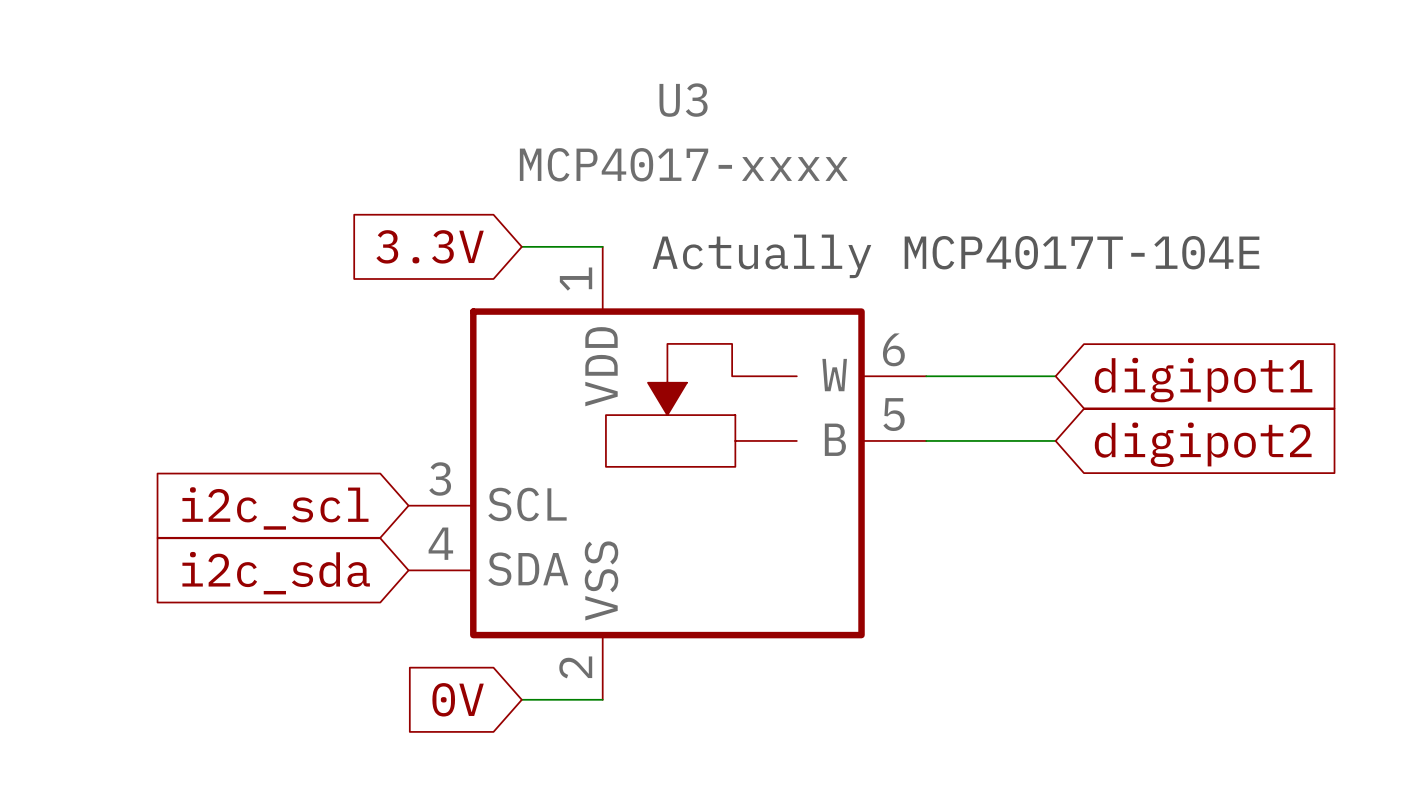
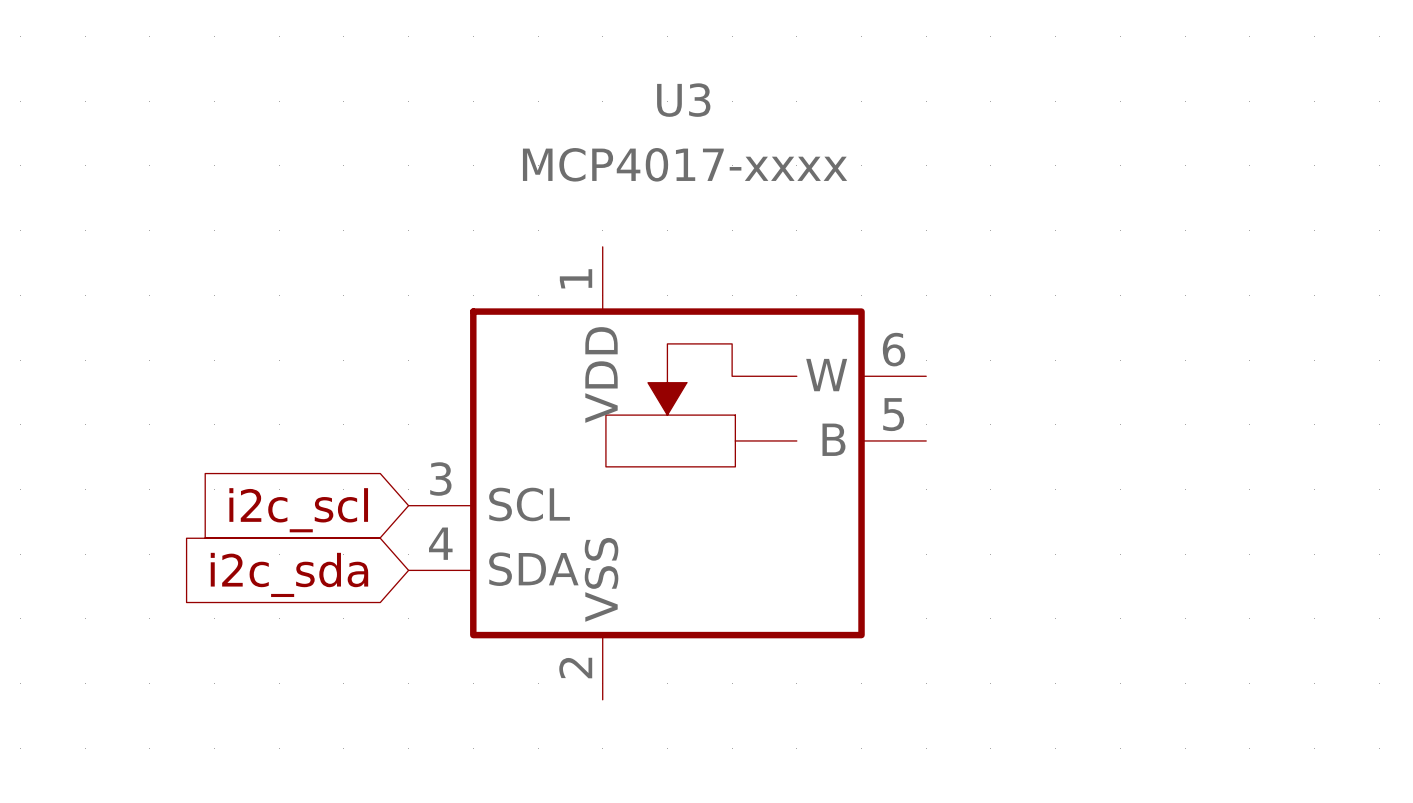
global label: 3.3V (430, 246) -> none
wire: (521, 246) (602, 246) -> none
text: Actually MCP4017T-104E (956, 256) -> none
wire: (926, 376) (1055, 376) -> none
global label: digipot1 (1203, 380) -> none
wire: (926, 440) (1055, 440) -> none
global label: digipot2 (1203, 444) -> none
global label: 0V (458, 699) -> none
wire: (521, 699) (602, 699) -> none

